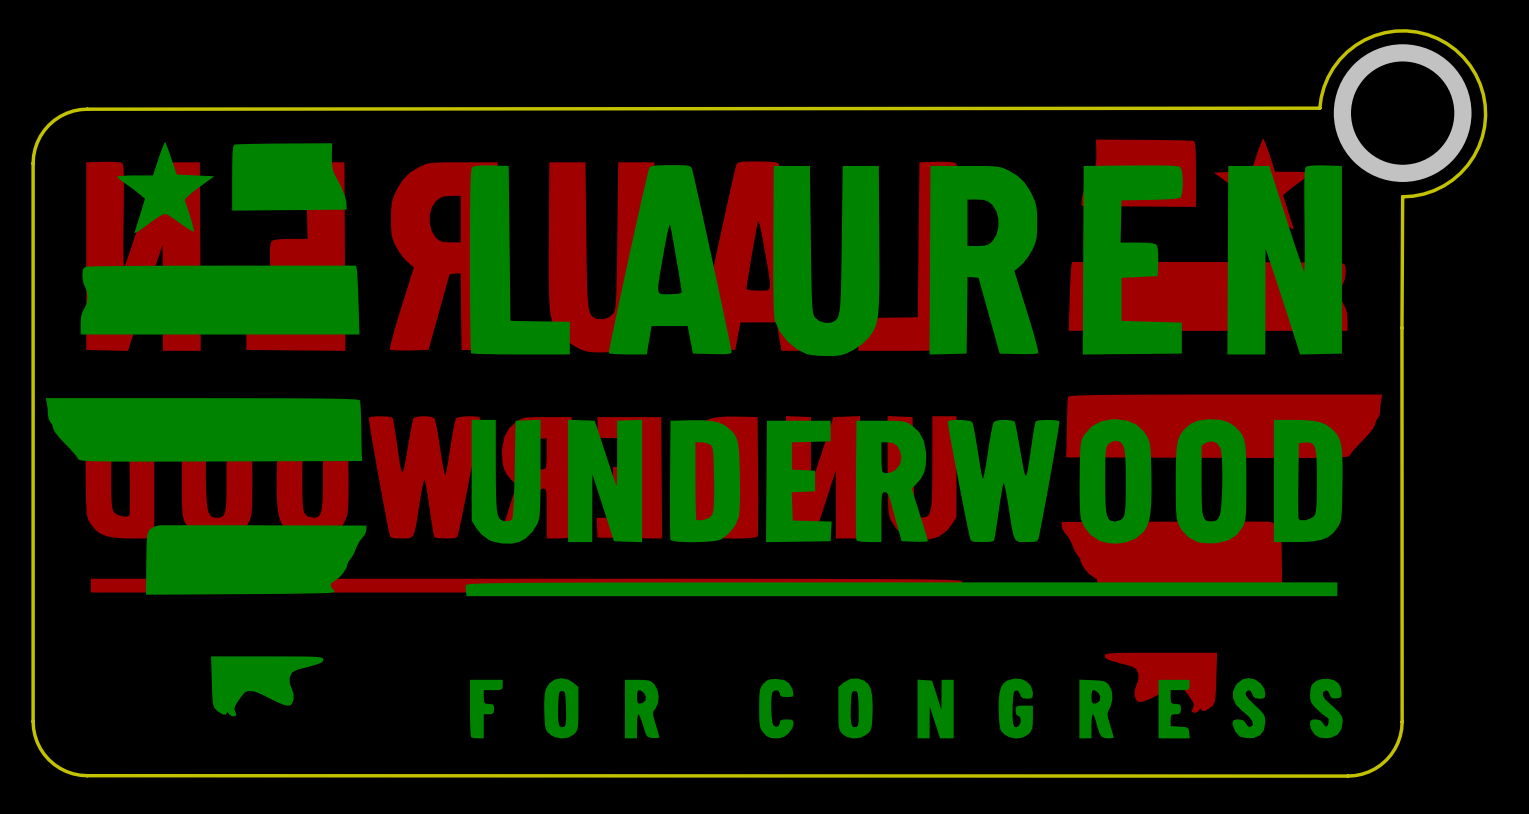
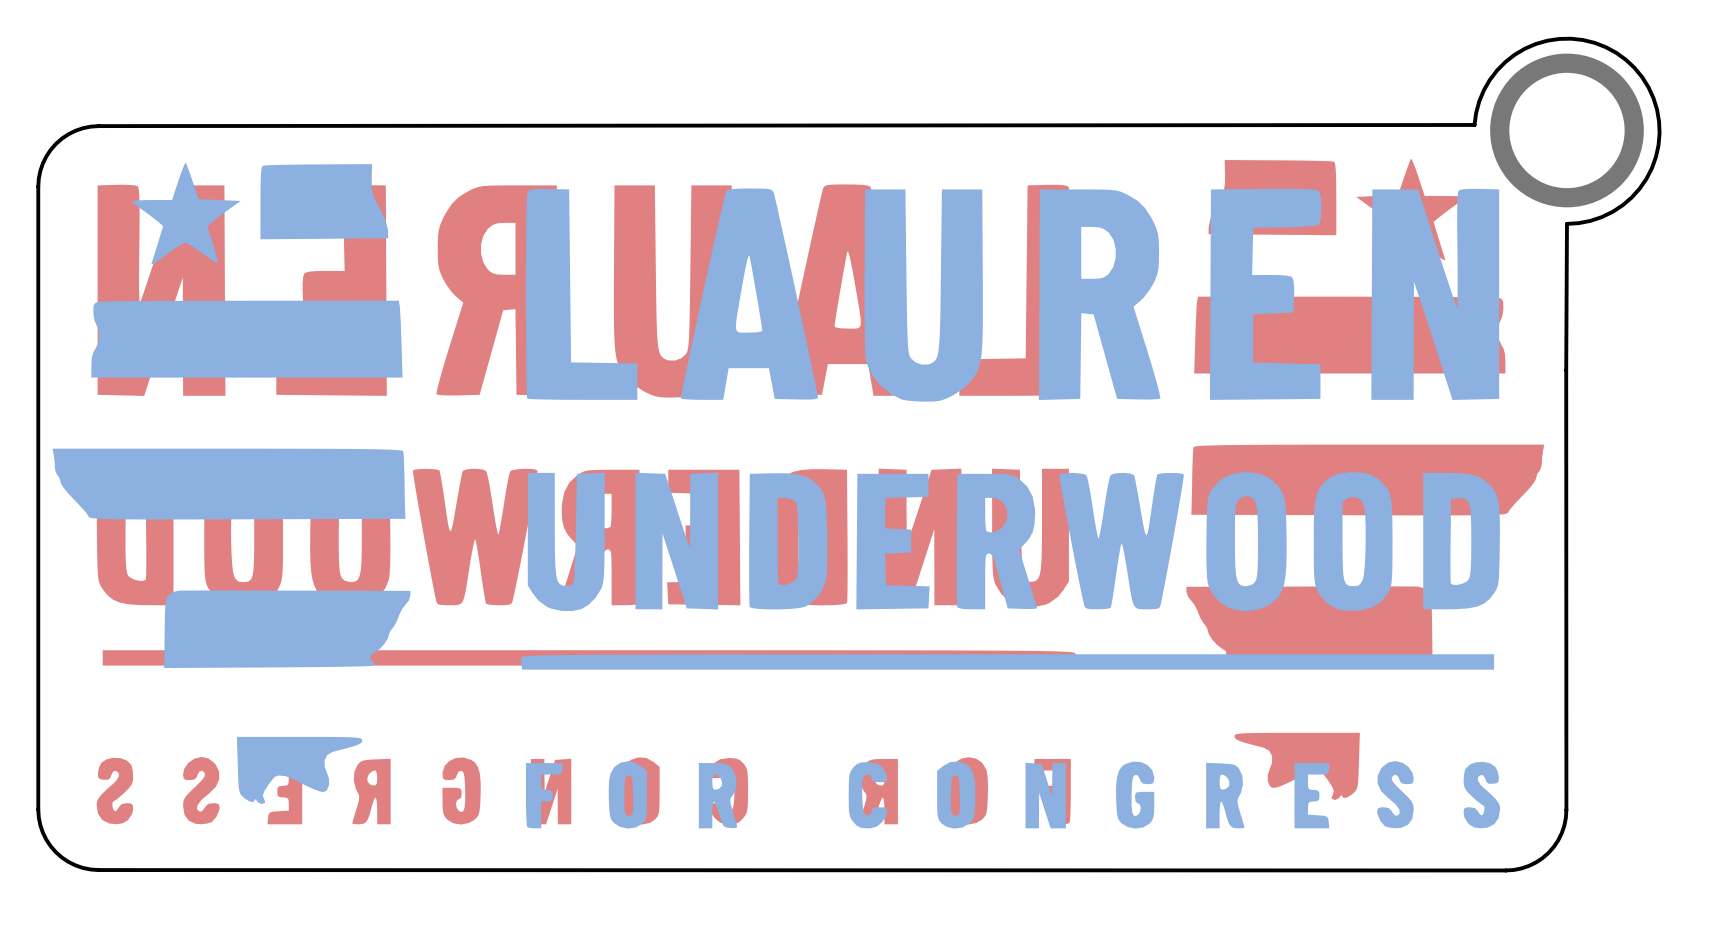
drawing: none -> [96, 158, 1465, 825]

